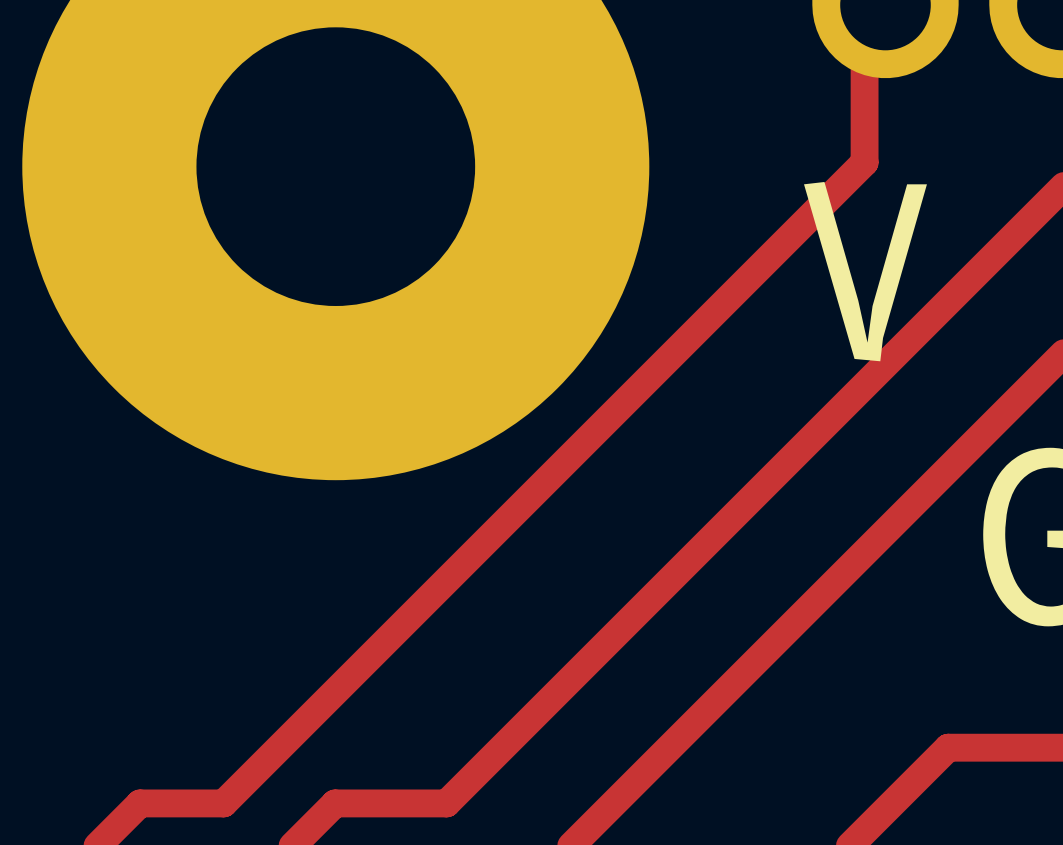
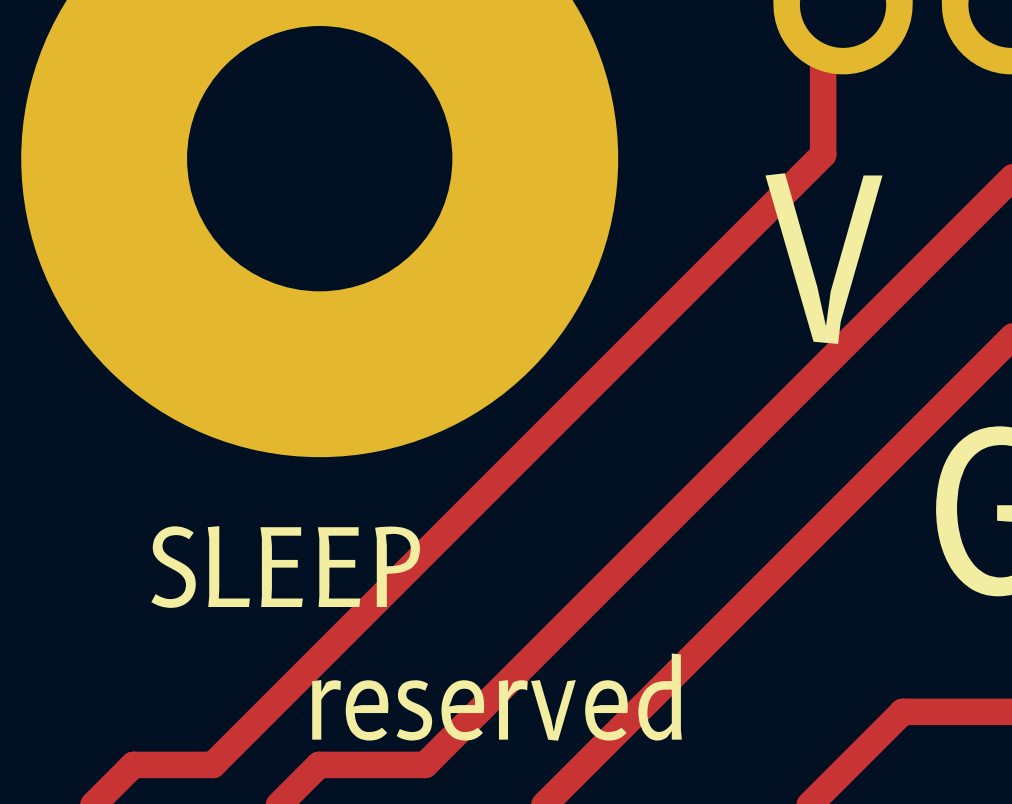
text: none -> SLEEP (285, 567)
text: none -> reserved (497, 697)

